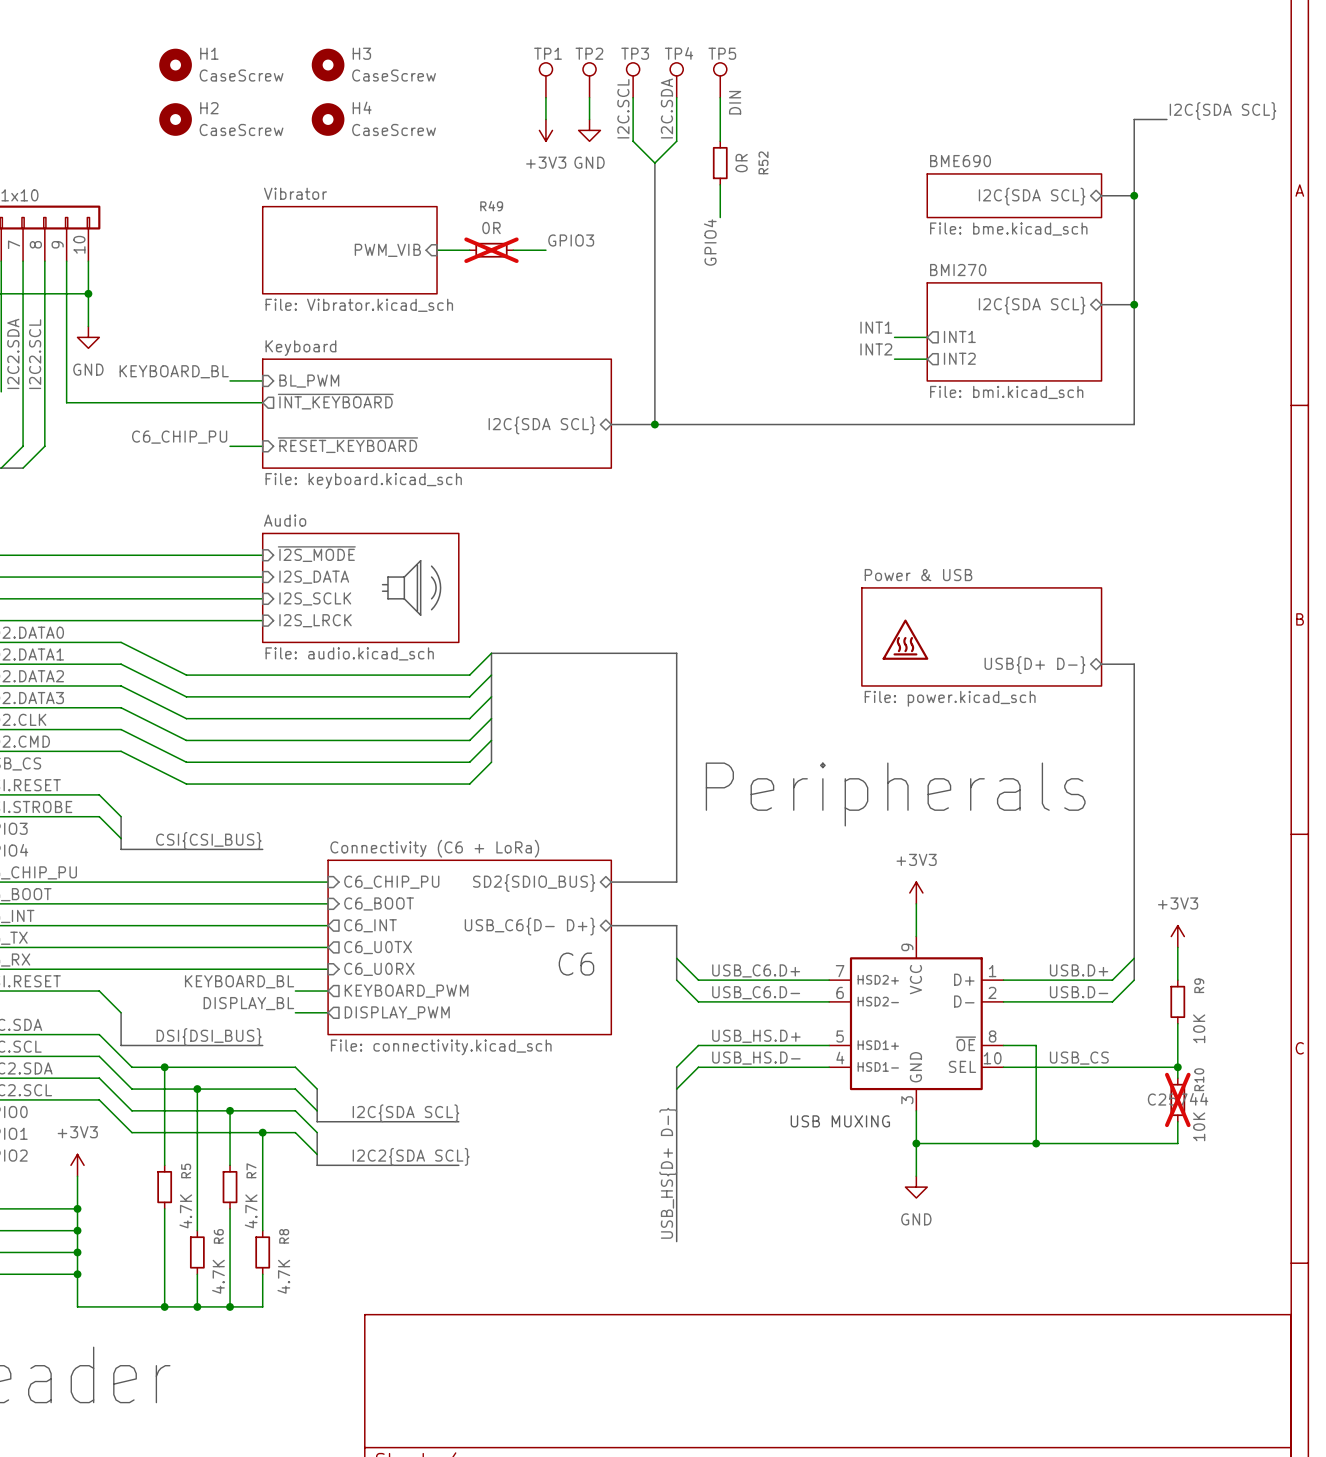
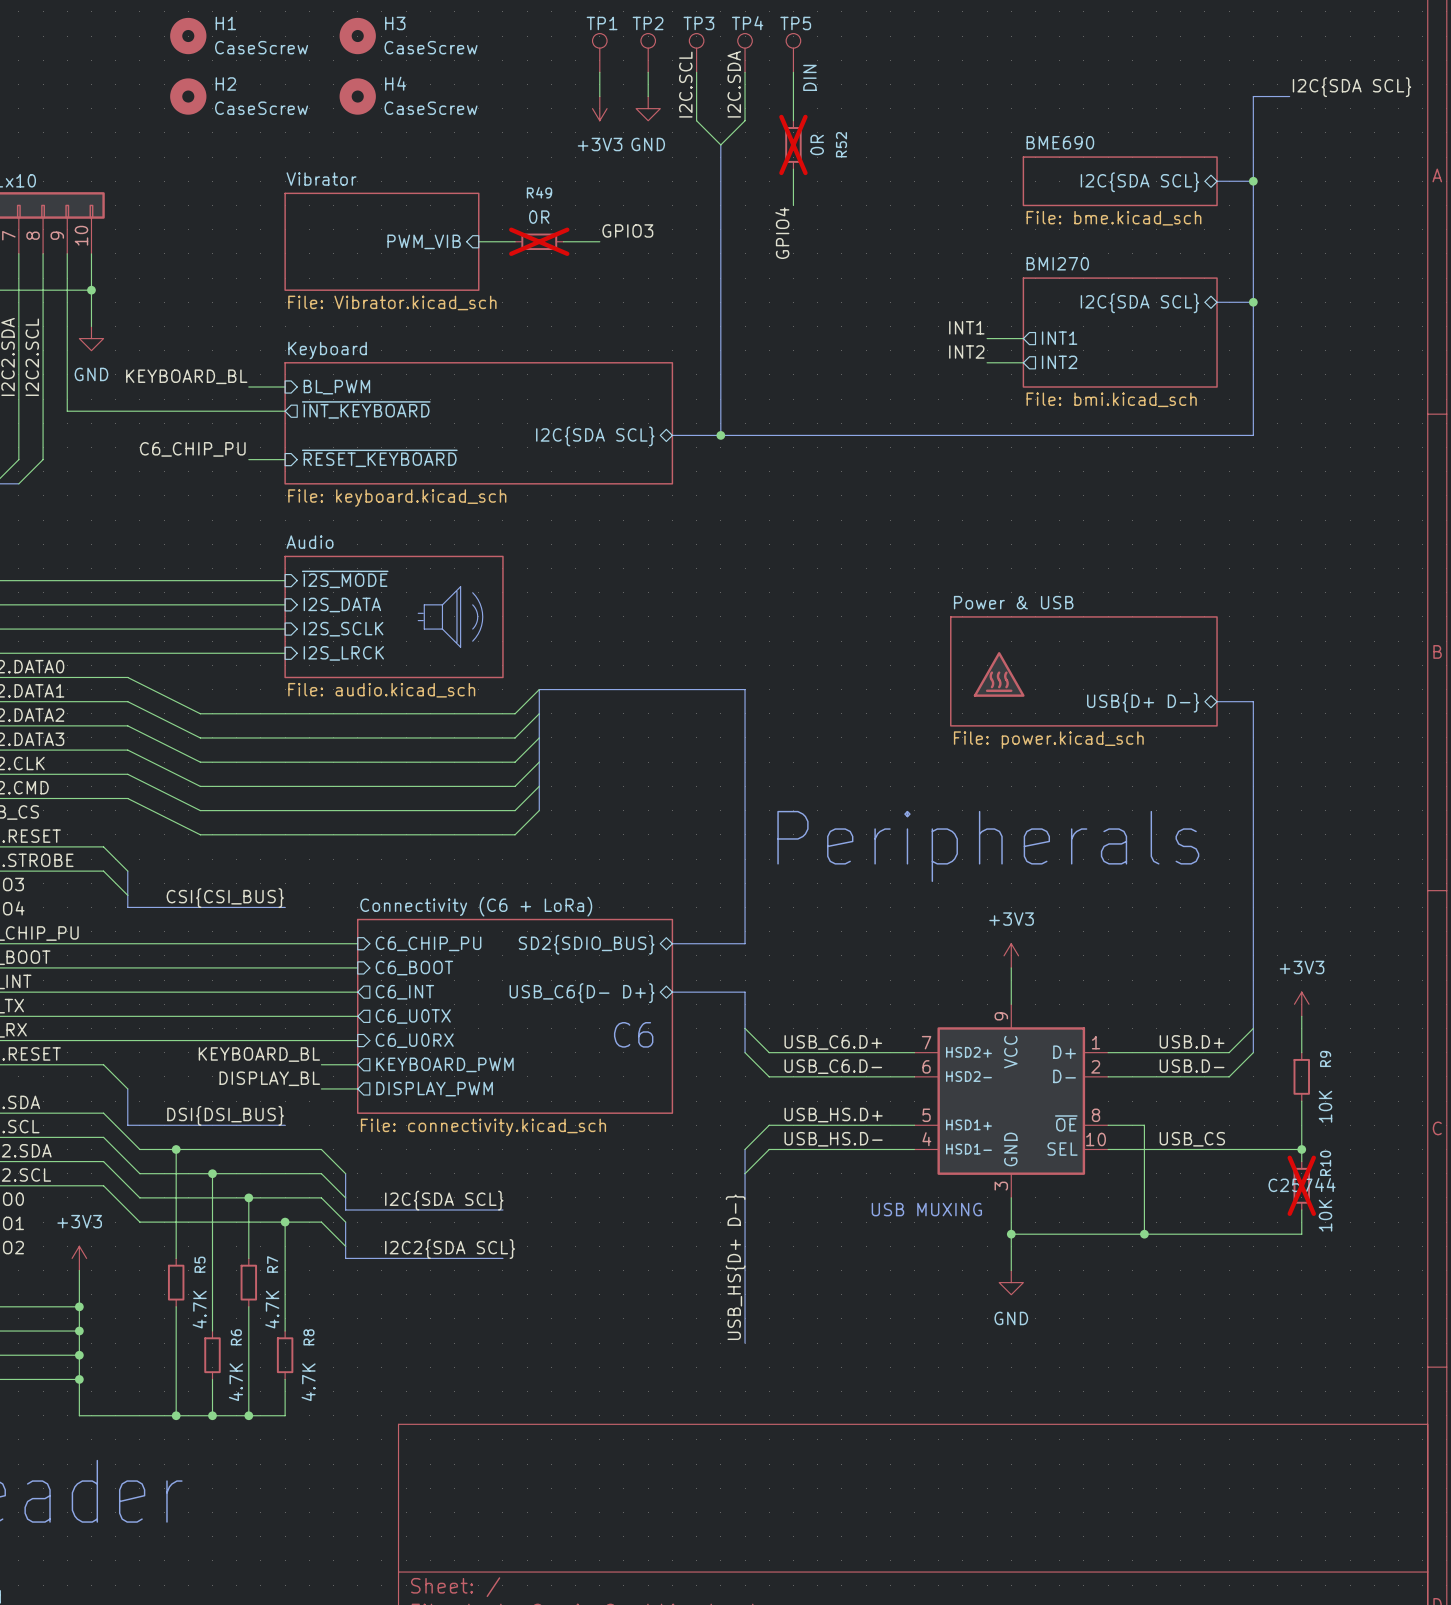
R52 do-not-place cross: none -> (793, 144)

